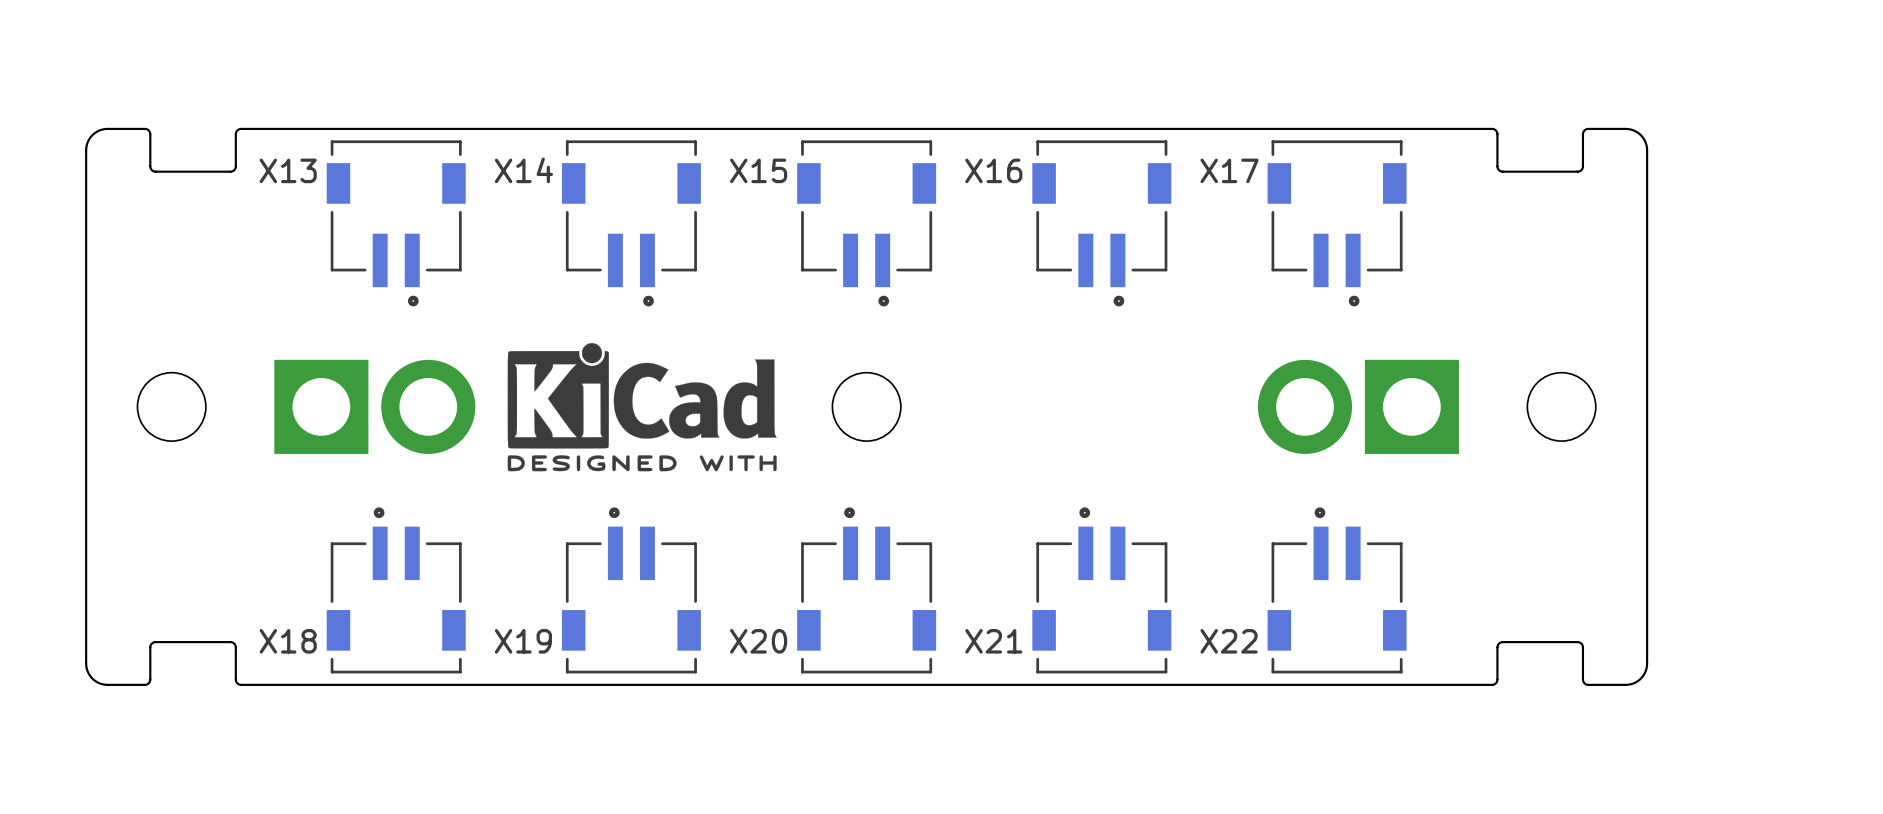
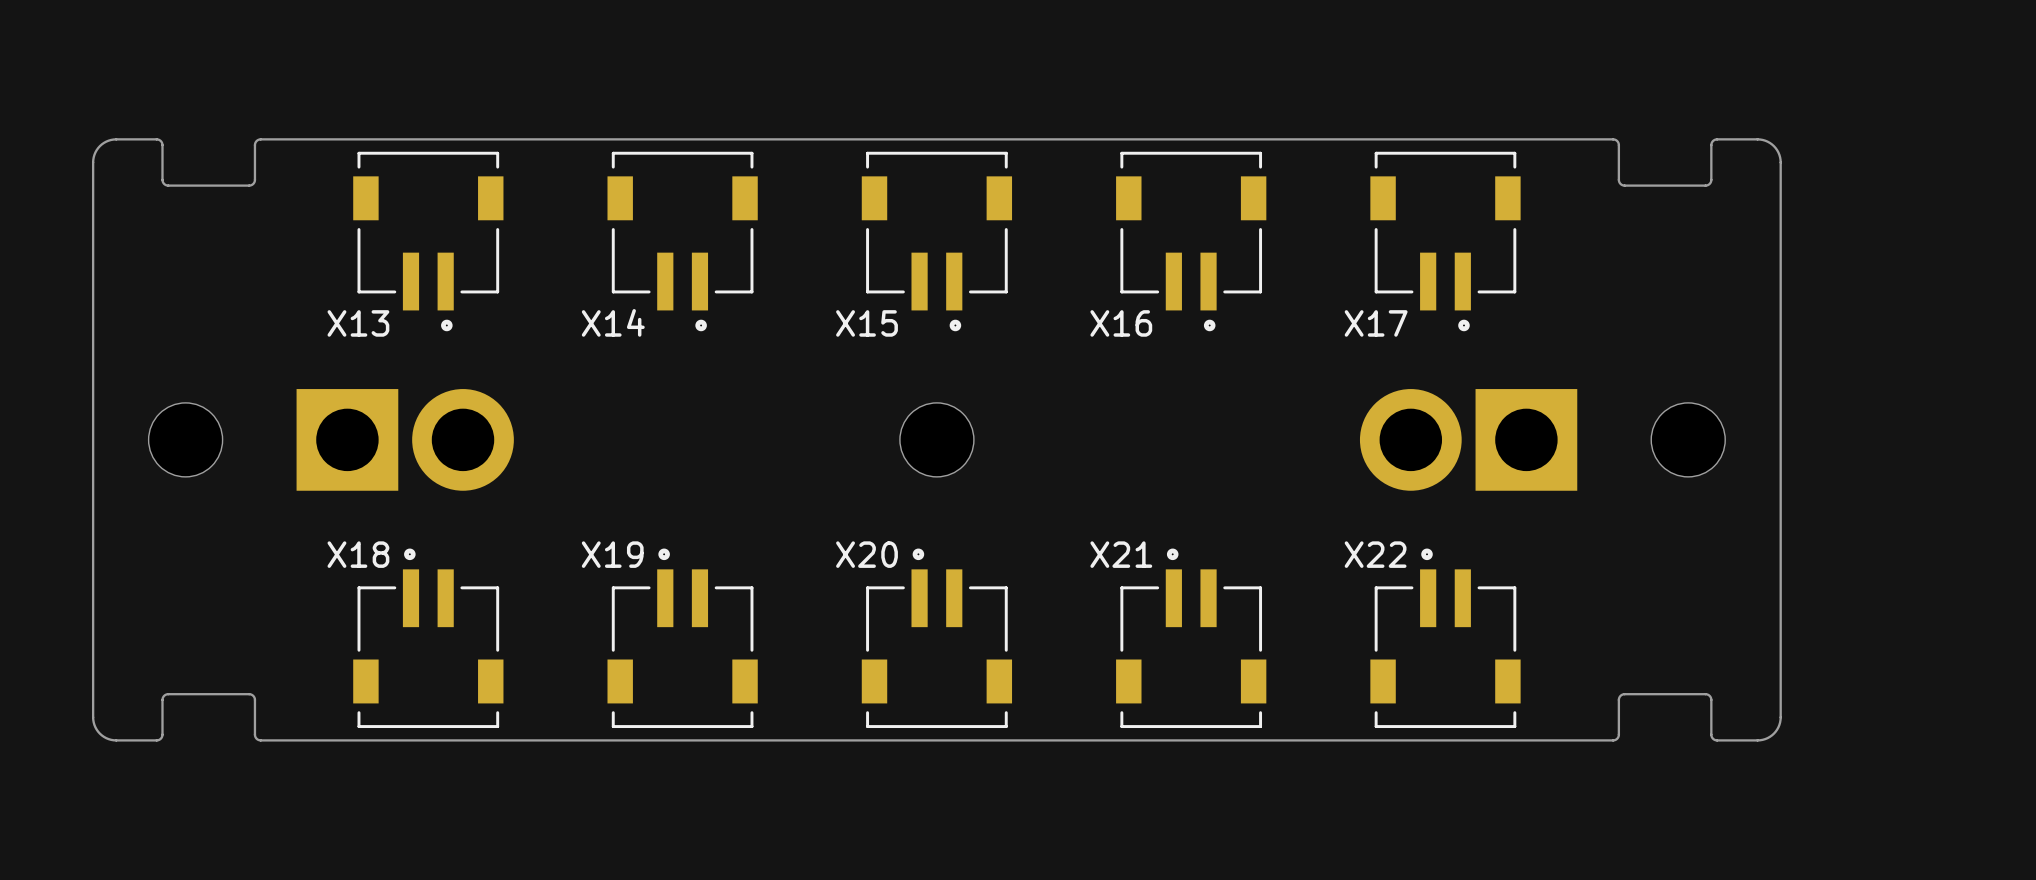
X13 name position: X13 (288, 170) -> X13 (358, 323)
X14 name position: X14 (523, 170) -> X14 (613, 322)
X15 name position: X15 (758, 170) -> X15 (867, 323)
X16 name position: X16 (993, 170) -> X16 (1121, 323)
X17 name position: X17 (1229, 170) -> X17 (1376, 323)
drawing: [507, 343, 777, 472] -> none
X18 name position: X18 (288, 641) -> X18 (358, 554)
X19 name position: X19 (523, 641) -> X19 (612, 554)
X20 name position: X20 (758, 641) -> X20 (867, 554)
X21 name position: X21 (993, 641) -> X21 (1121, 554)
X22 name position: X22 (1229, 641) -> X22 (1375, 554)

